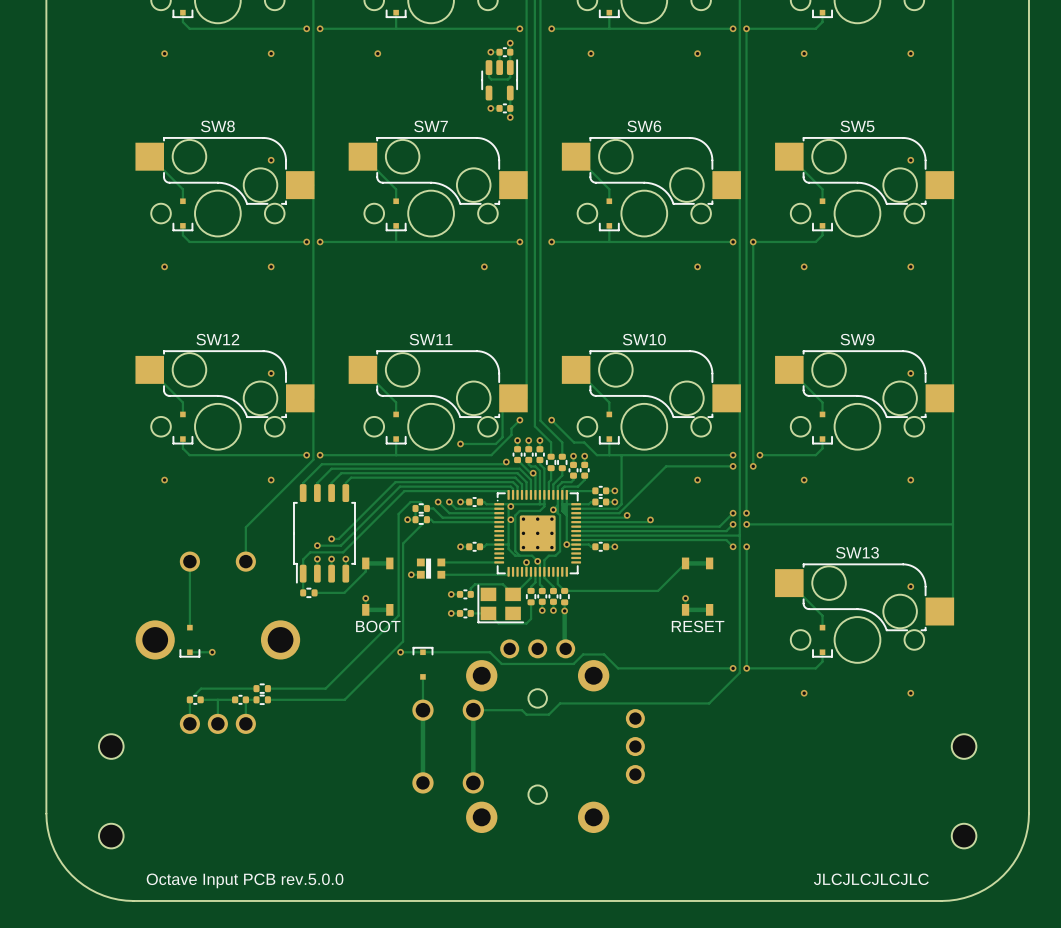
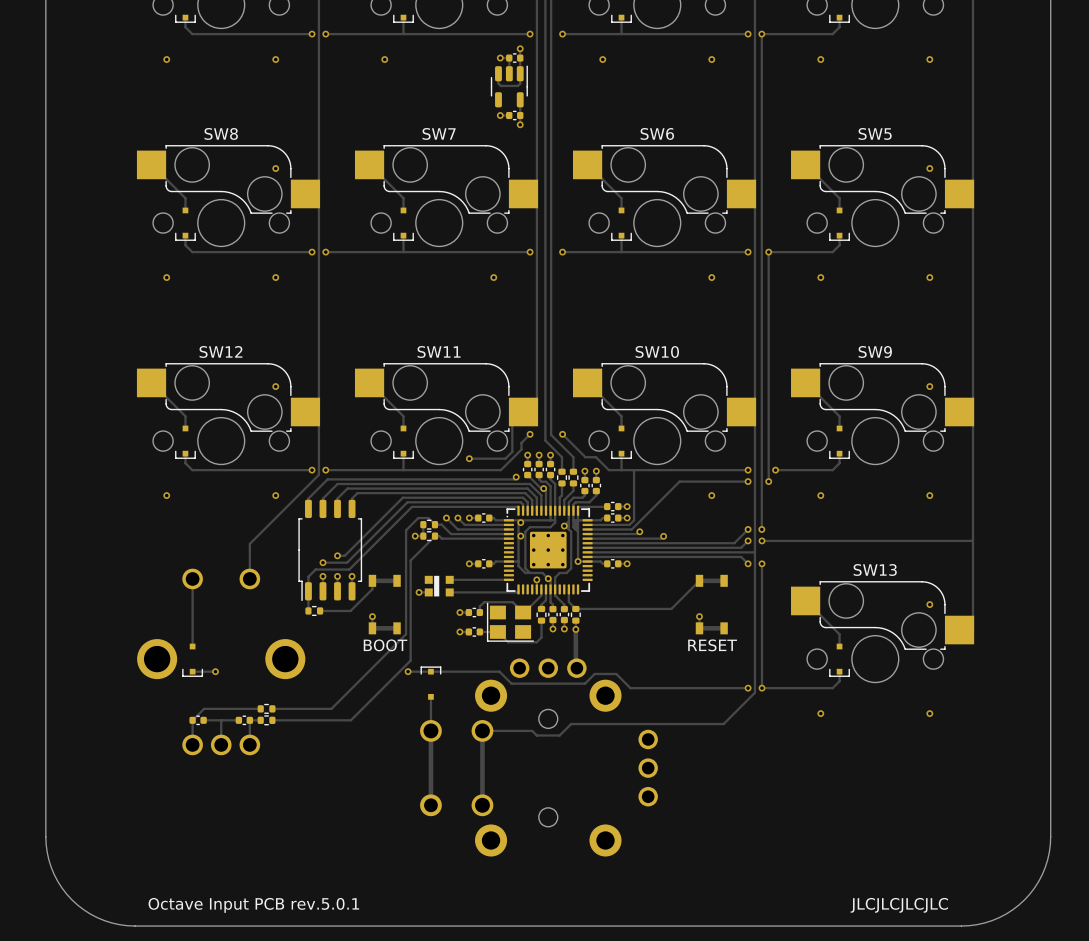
part: (111, 746) -> none
part: (964, 746) -> none
part: (111, 836) -> none
part: (964, 836) -> none
text: Octave Input PCB rev.5.0.0 (245, 880) -> Octave Input PCB rev.5.0.1 (253, 905)

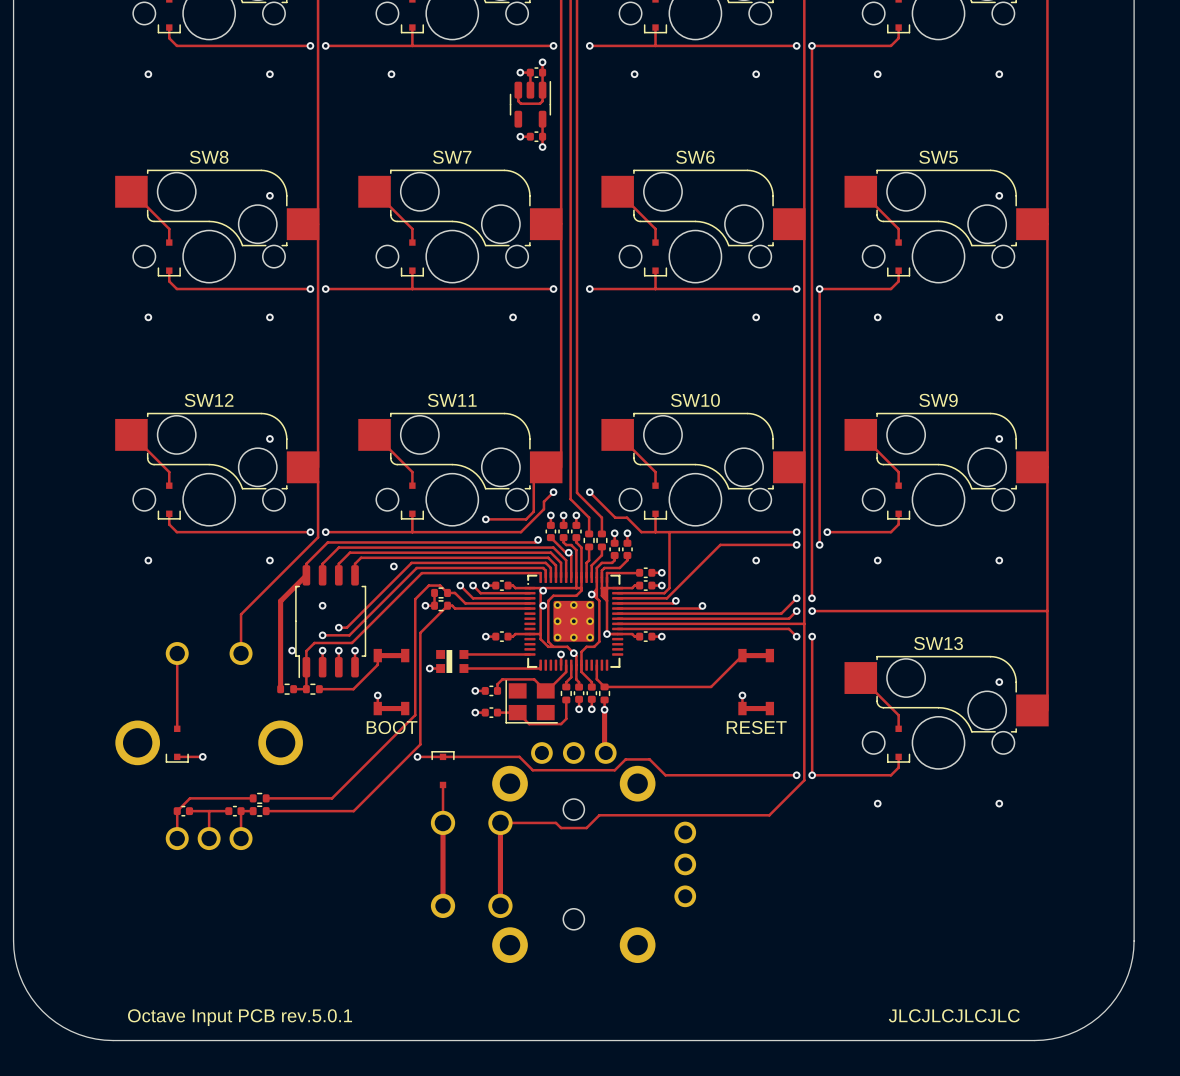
via: none -> (393, 566)
track: none -> (306, 575) (280, 601) (280, 689)
via: none -> (322, 605)
via: none -> (292, 650)
part: none -> (287, 689)
track: none -> (293, 689) (306, 689)

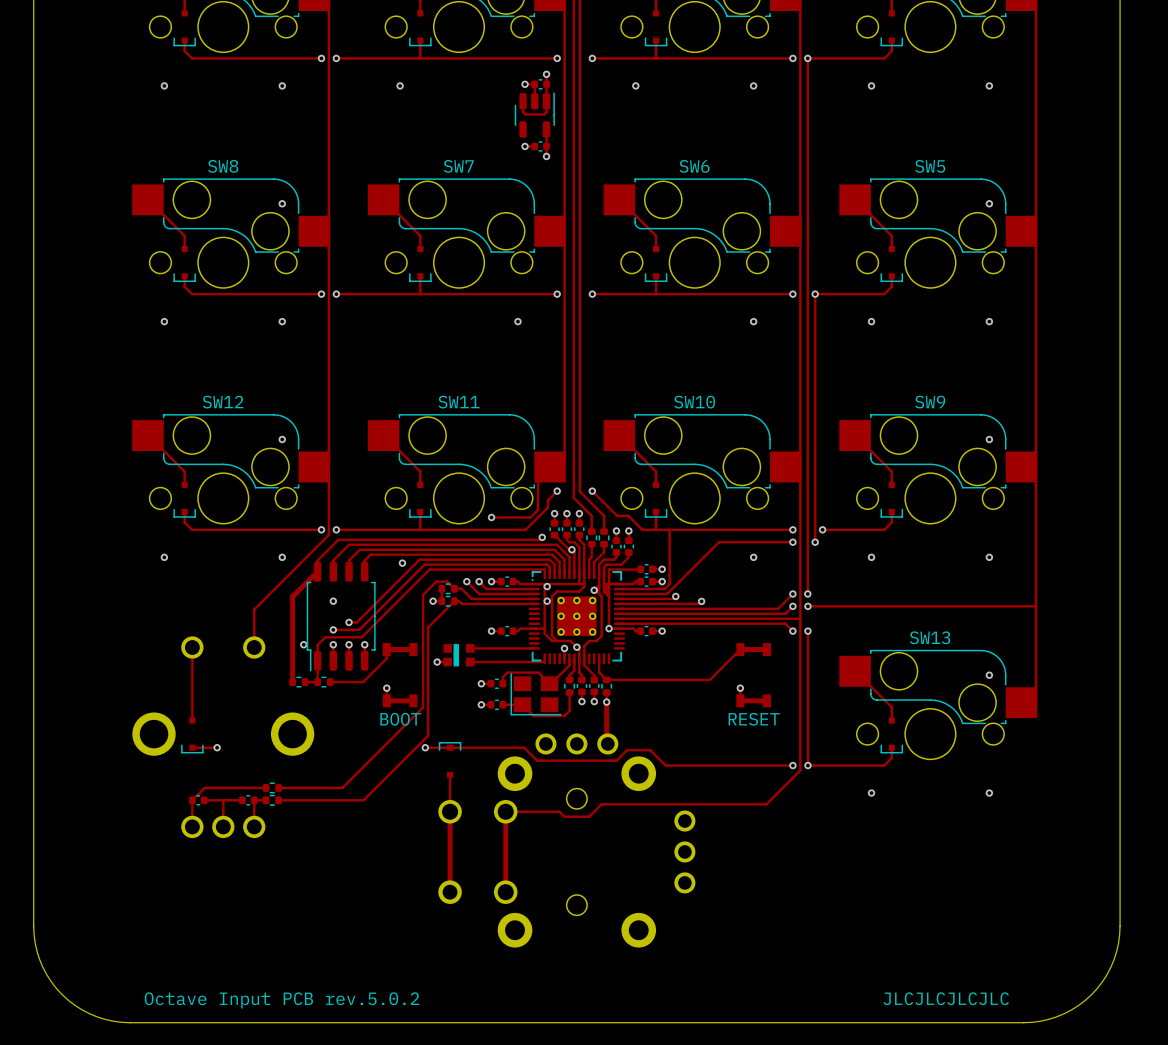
text: Octave Input PCB rev.5.0.1 (240, 1017) -> Octave Input PCB rev.5.0.2 (282, 1000)

